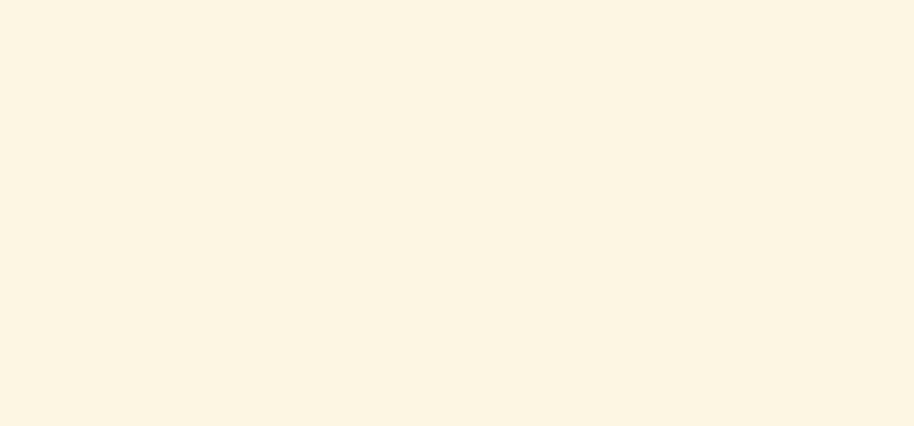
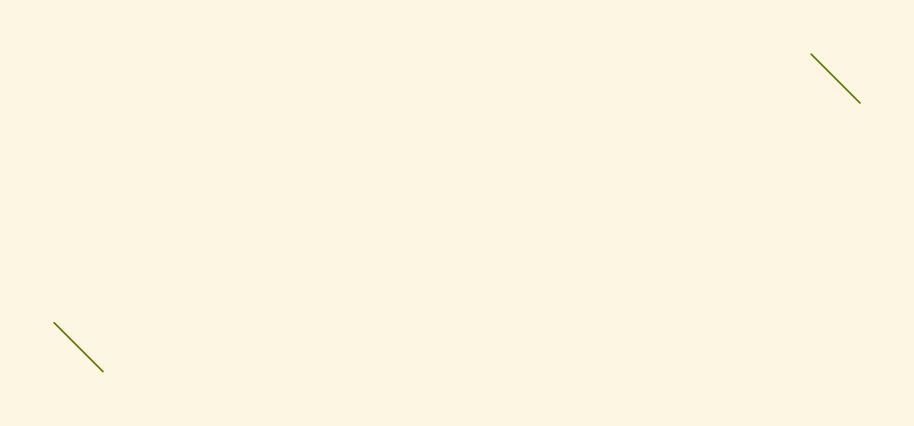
wire: none -> (811, 54) (859, 102)
wire: none -> (54, 322) (102, 371)

